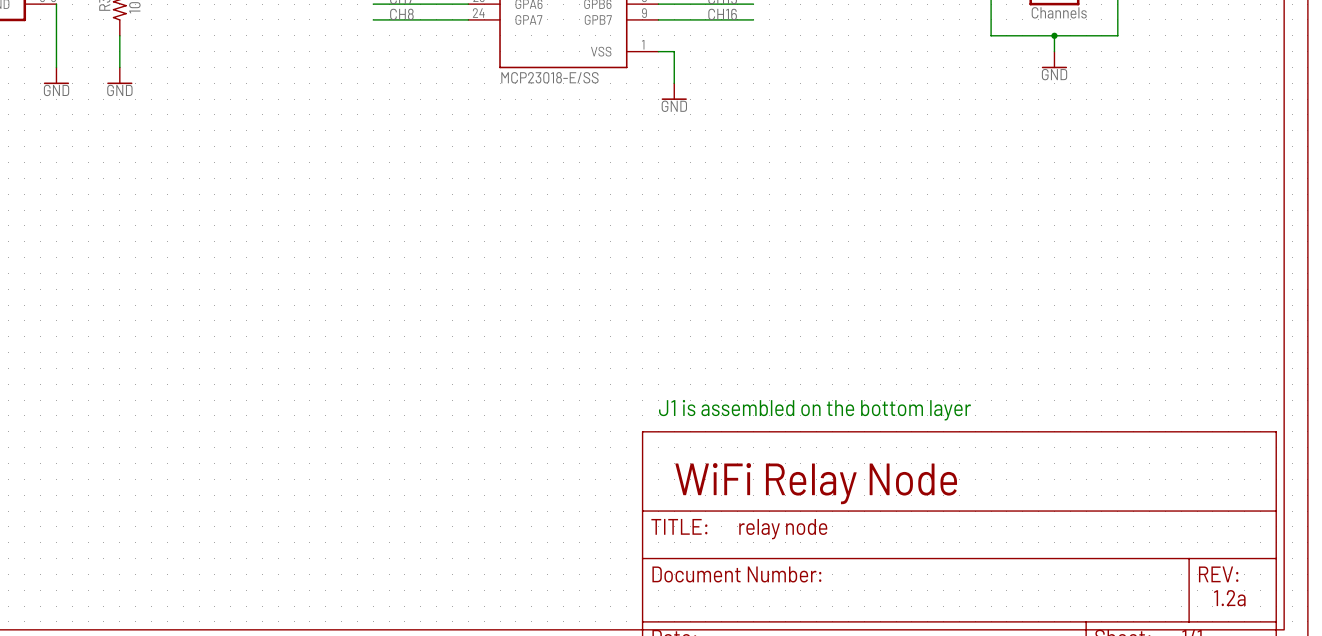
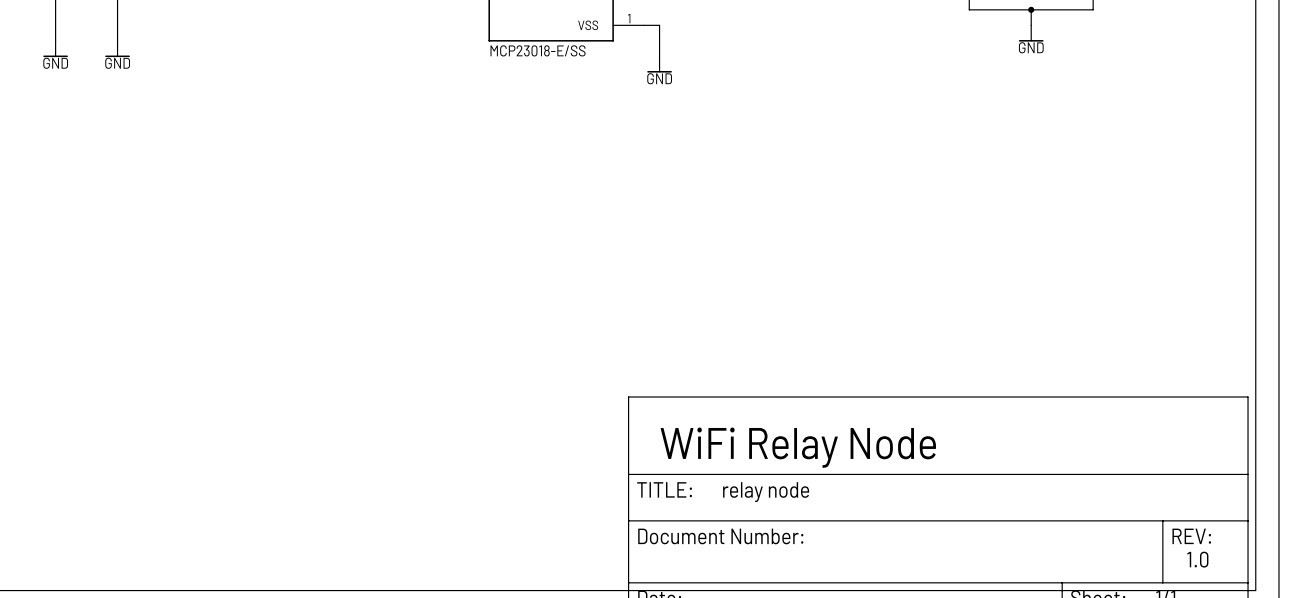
text: J1 is assembled on the bottom layer (814, 410) -> none
text: 1.2a (1229, 598) -> 1.0 (1197, 559)

